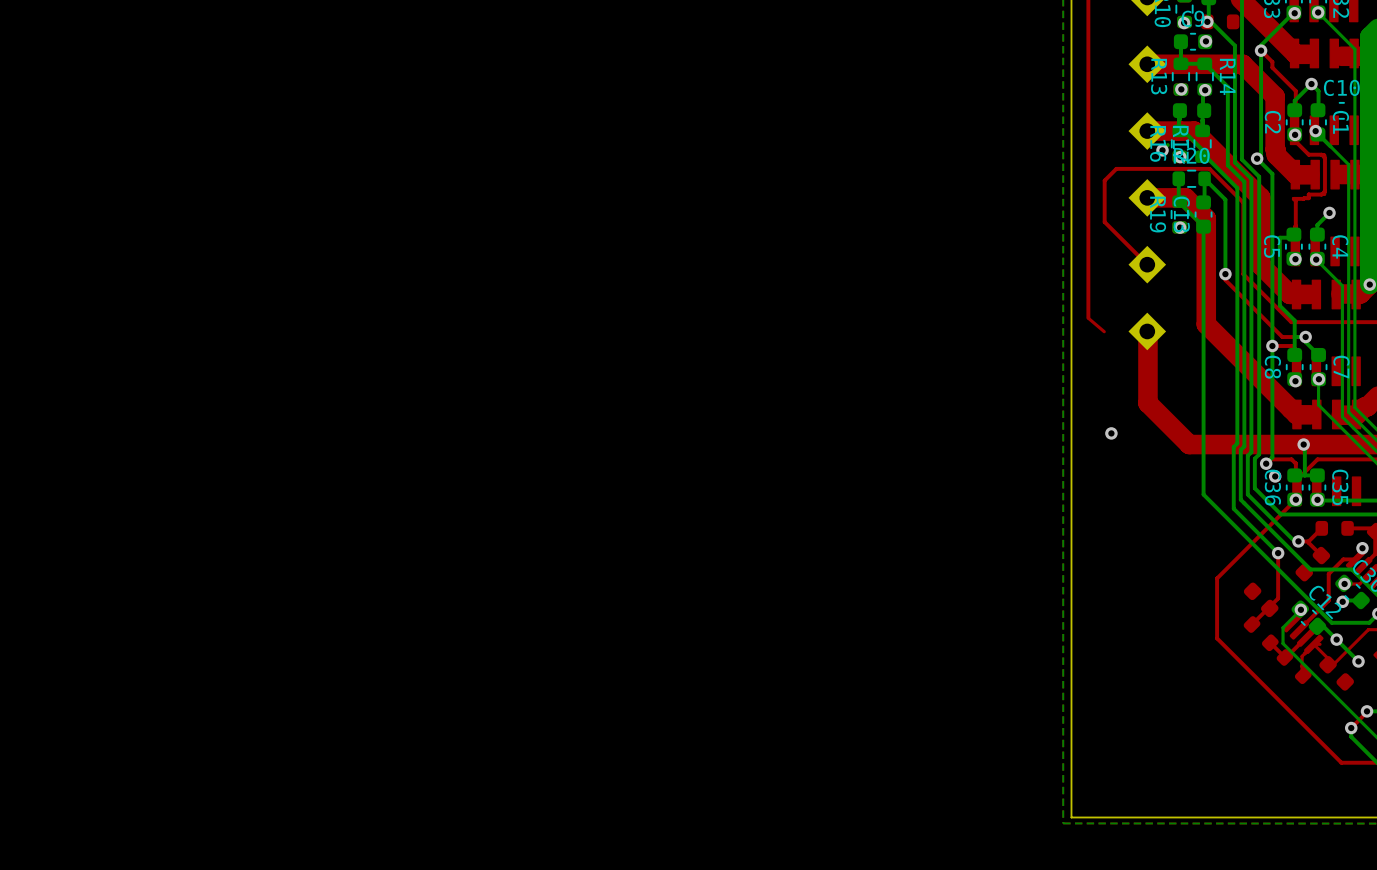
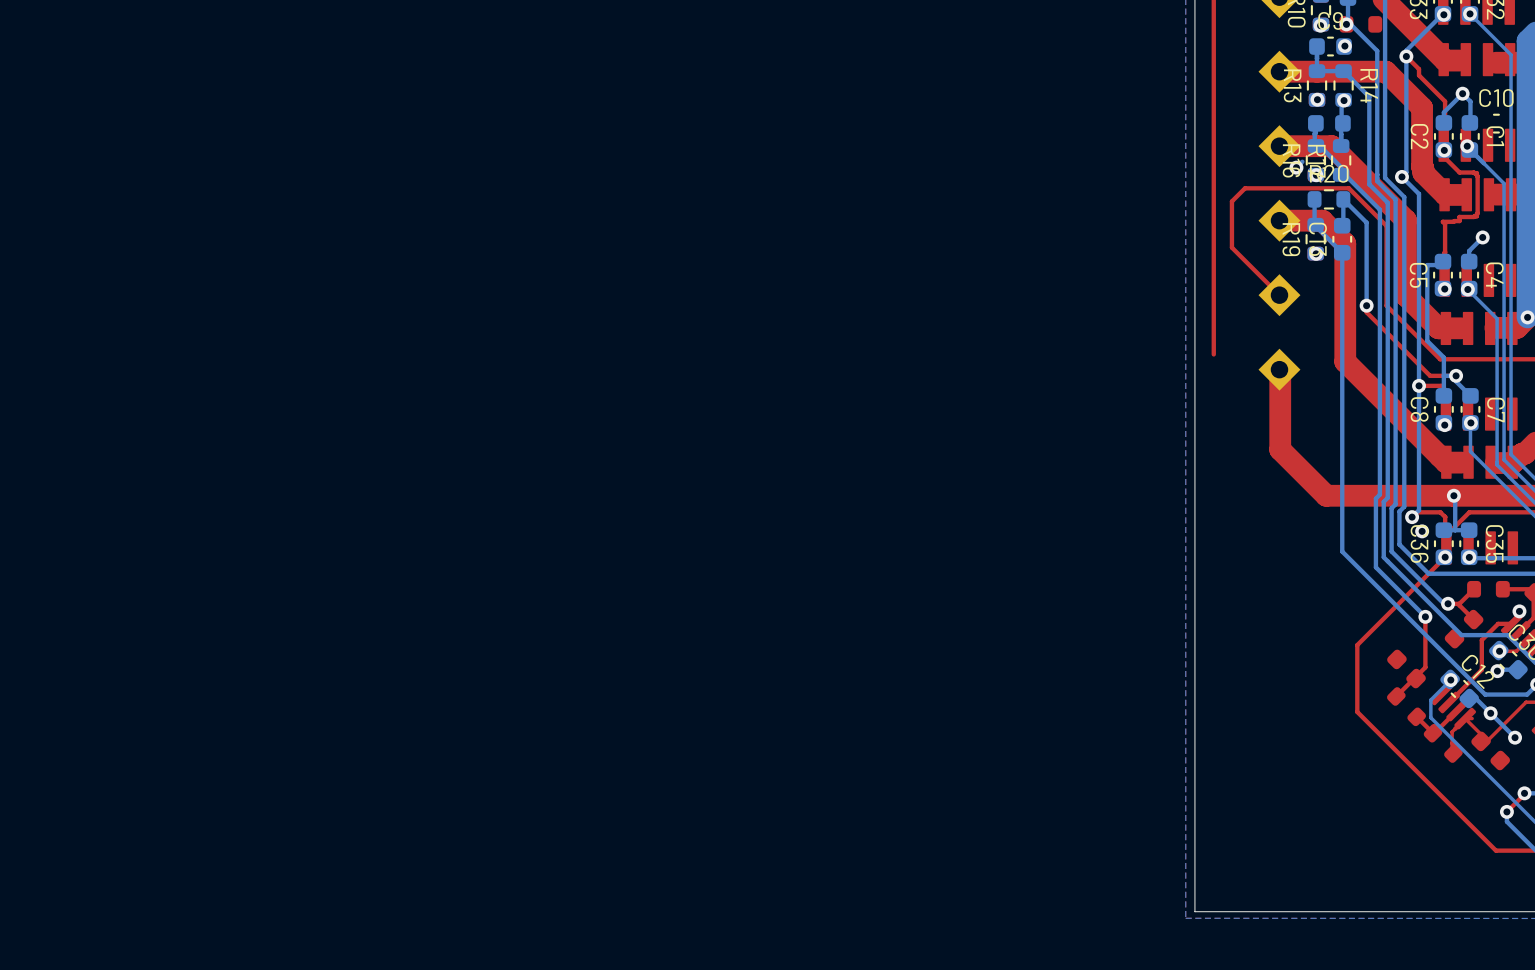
top track: (1088, 318) (1104, 331) -> none
via: (1111, 433) -> none

